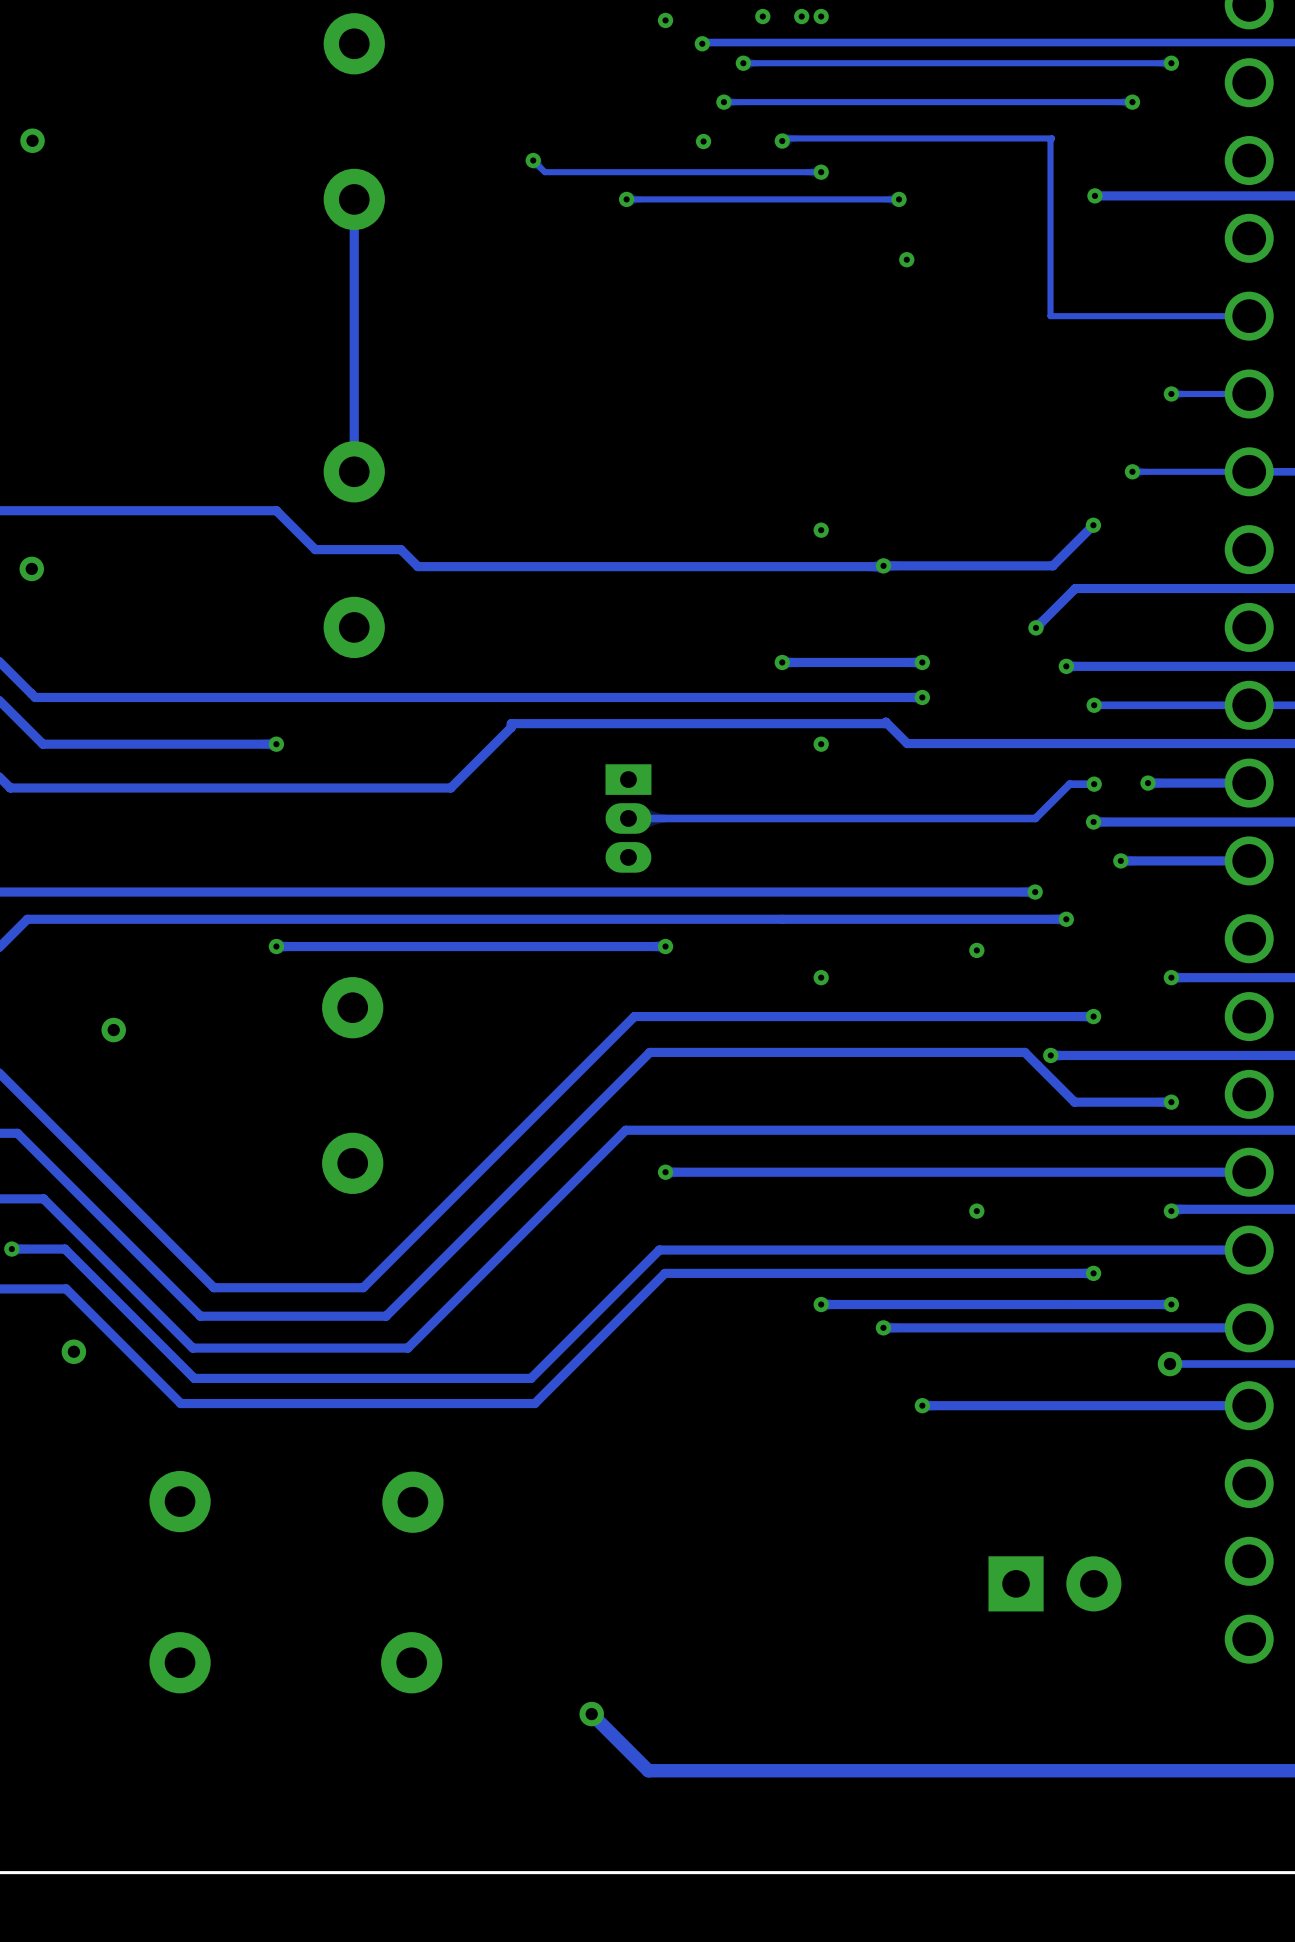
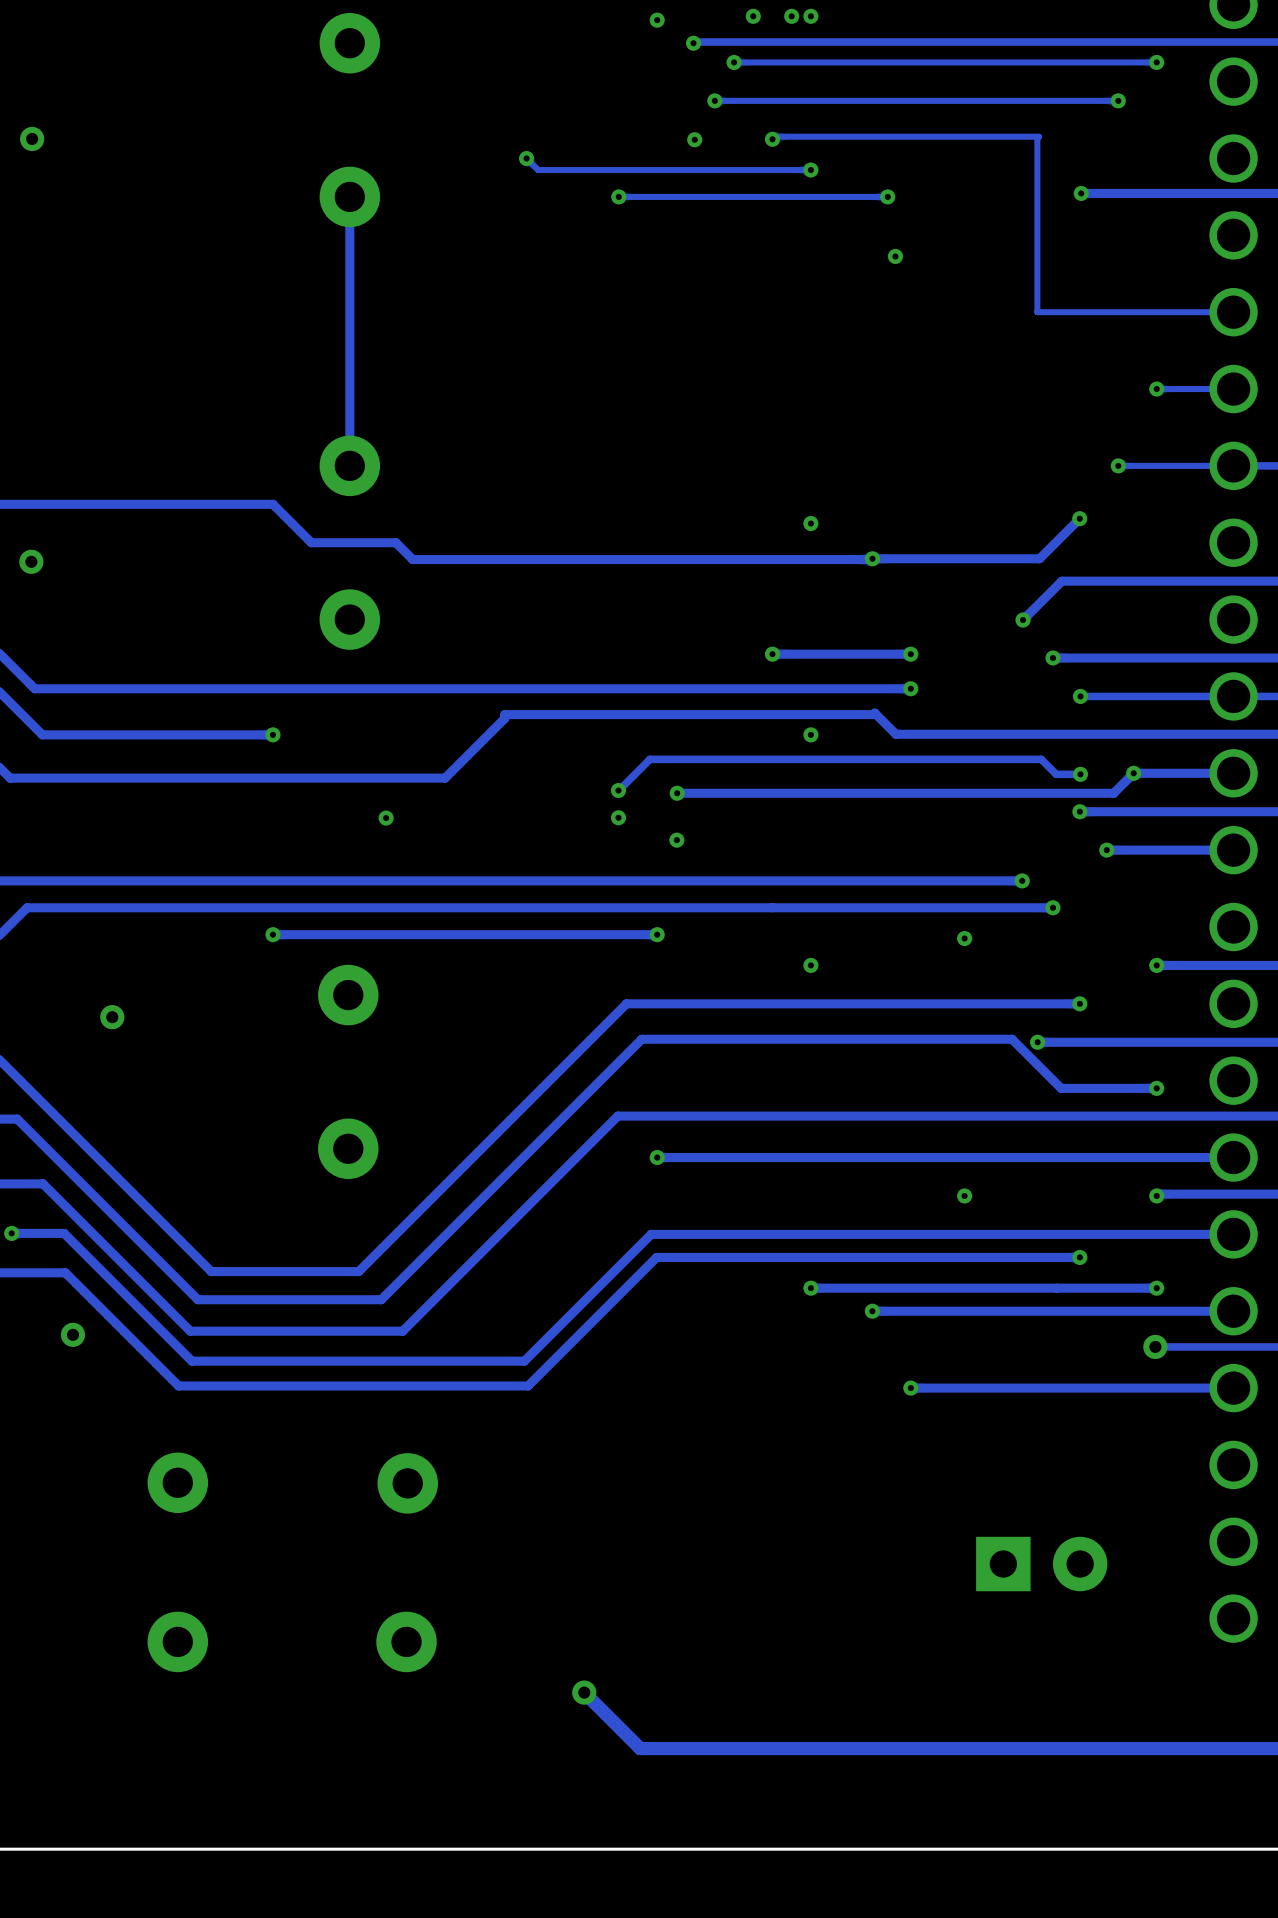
track: none -> (1133, 773) (1113, 793) (677, 793)
track: (1069, 784) (1035, 818) (623, 818) -> (1056, 774) (1041, 759) (649, 759) (618, 790)
via: none -> (618, 790)
via: none -> (677, 793)
part: (628, 818) -> none
via: none -> (386, 818)
via: none -> (618, 817)
via: none -> (676, 840)

